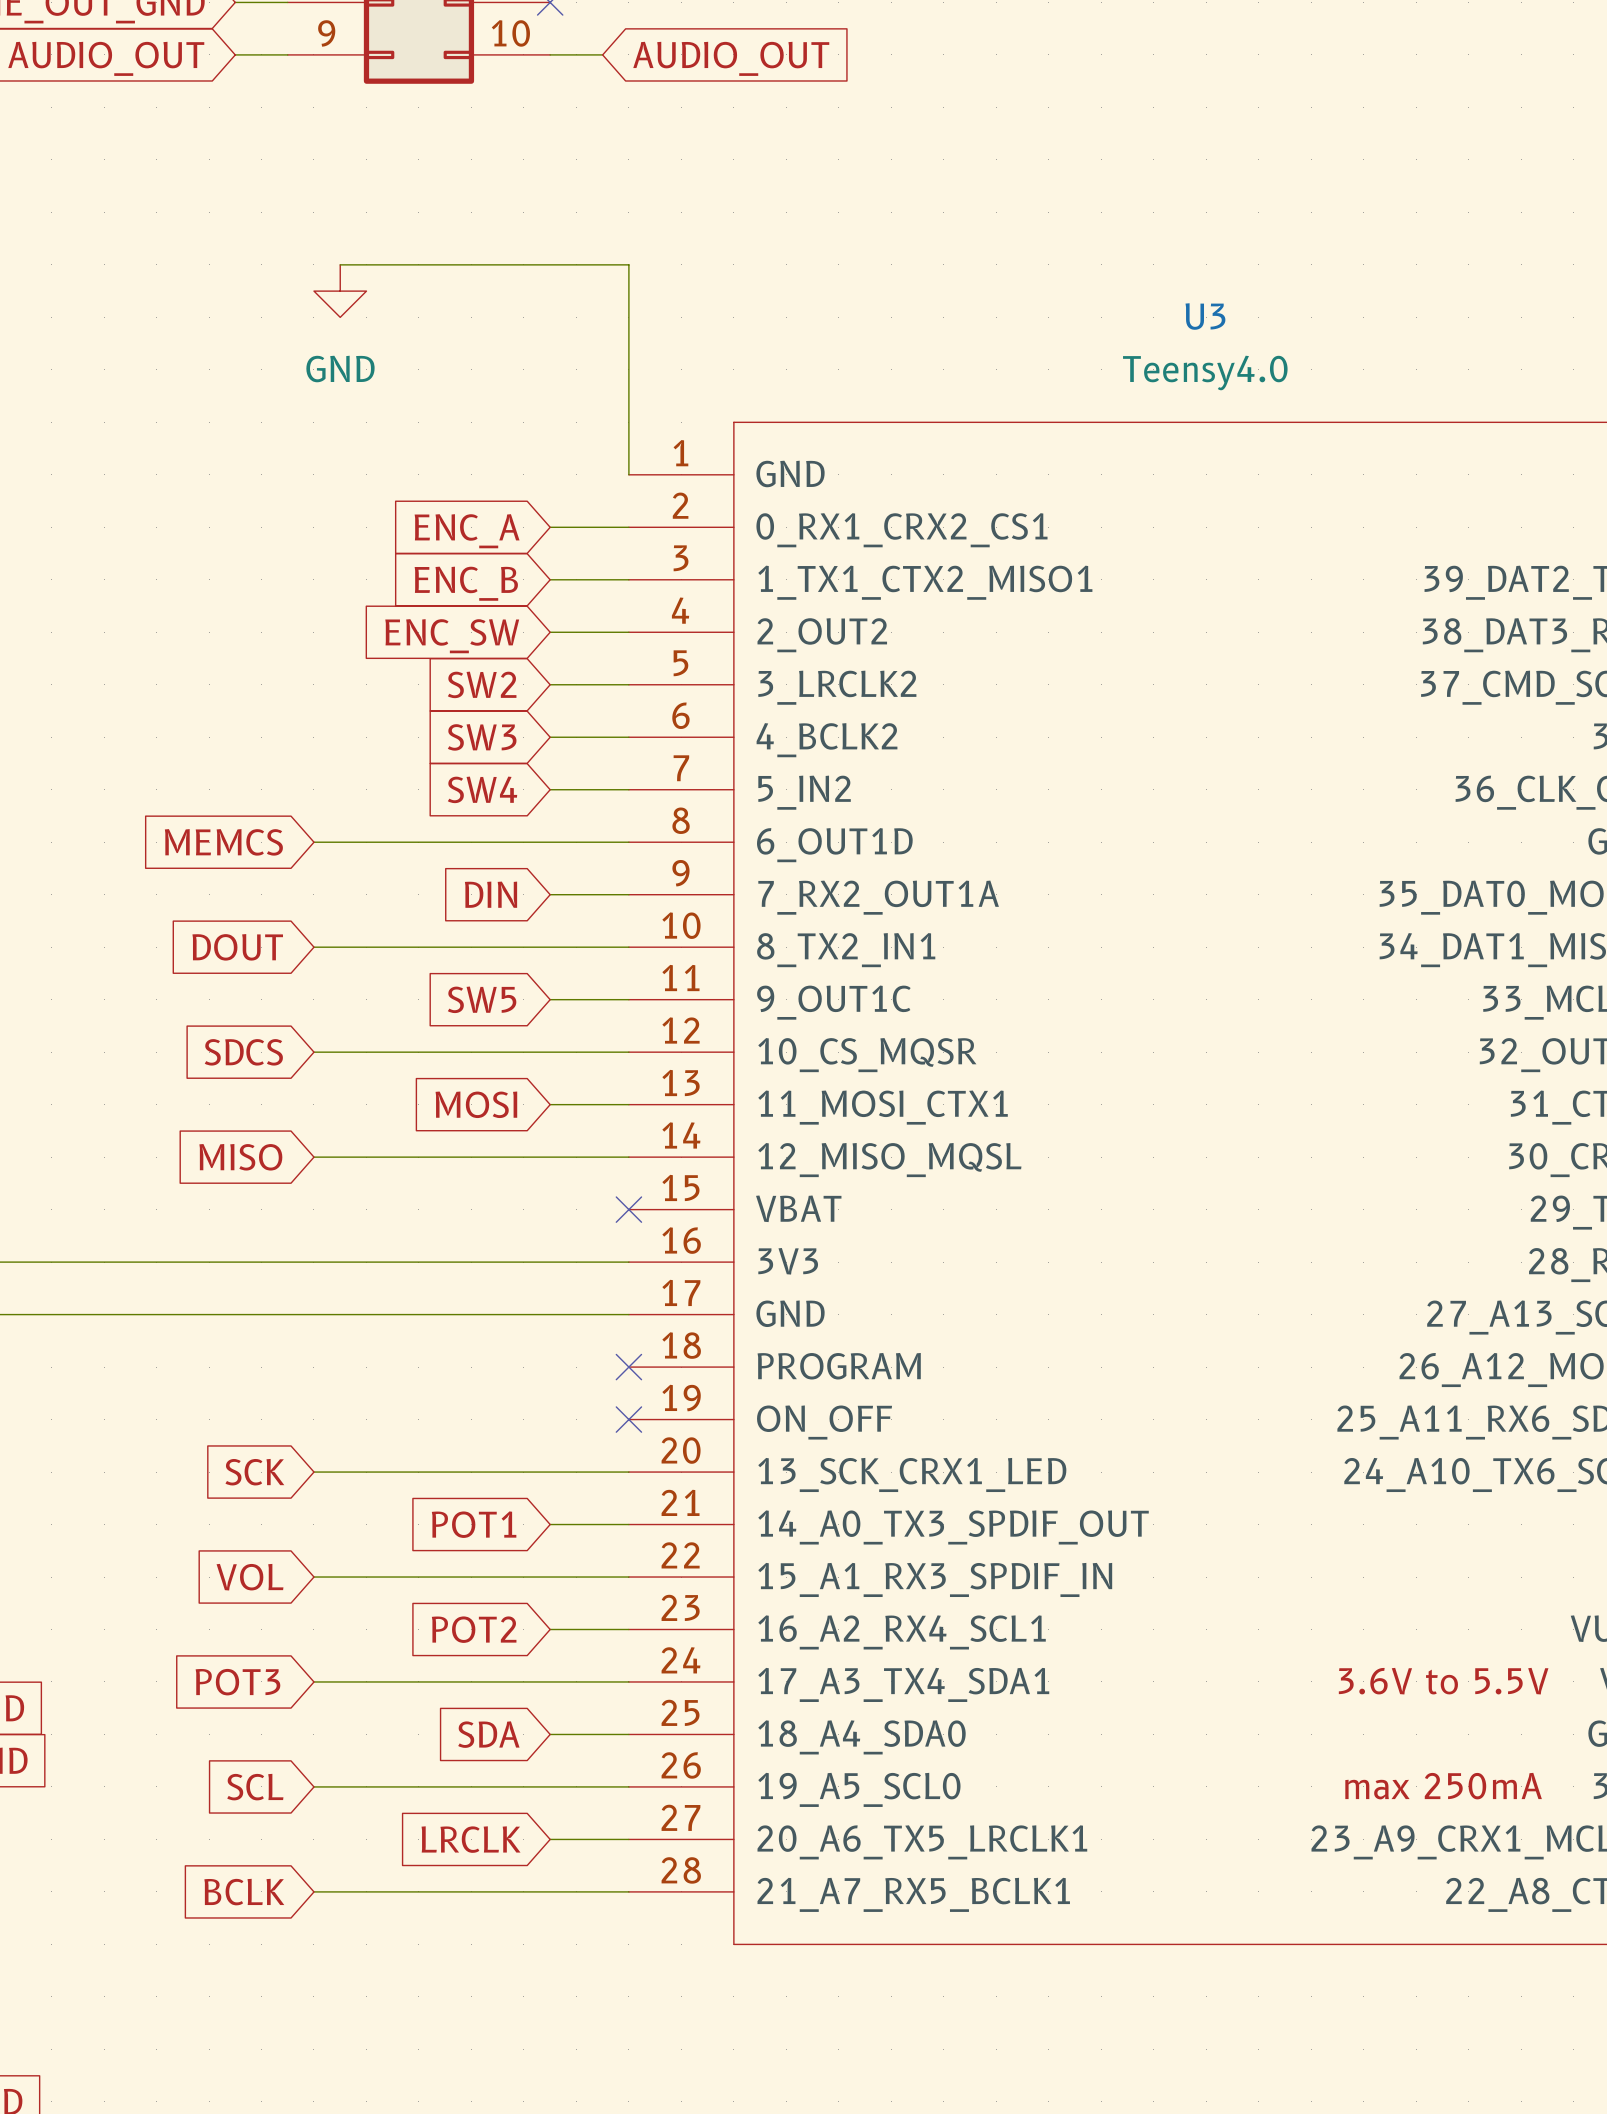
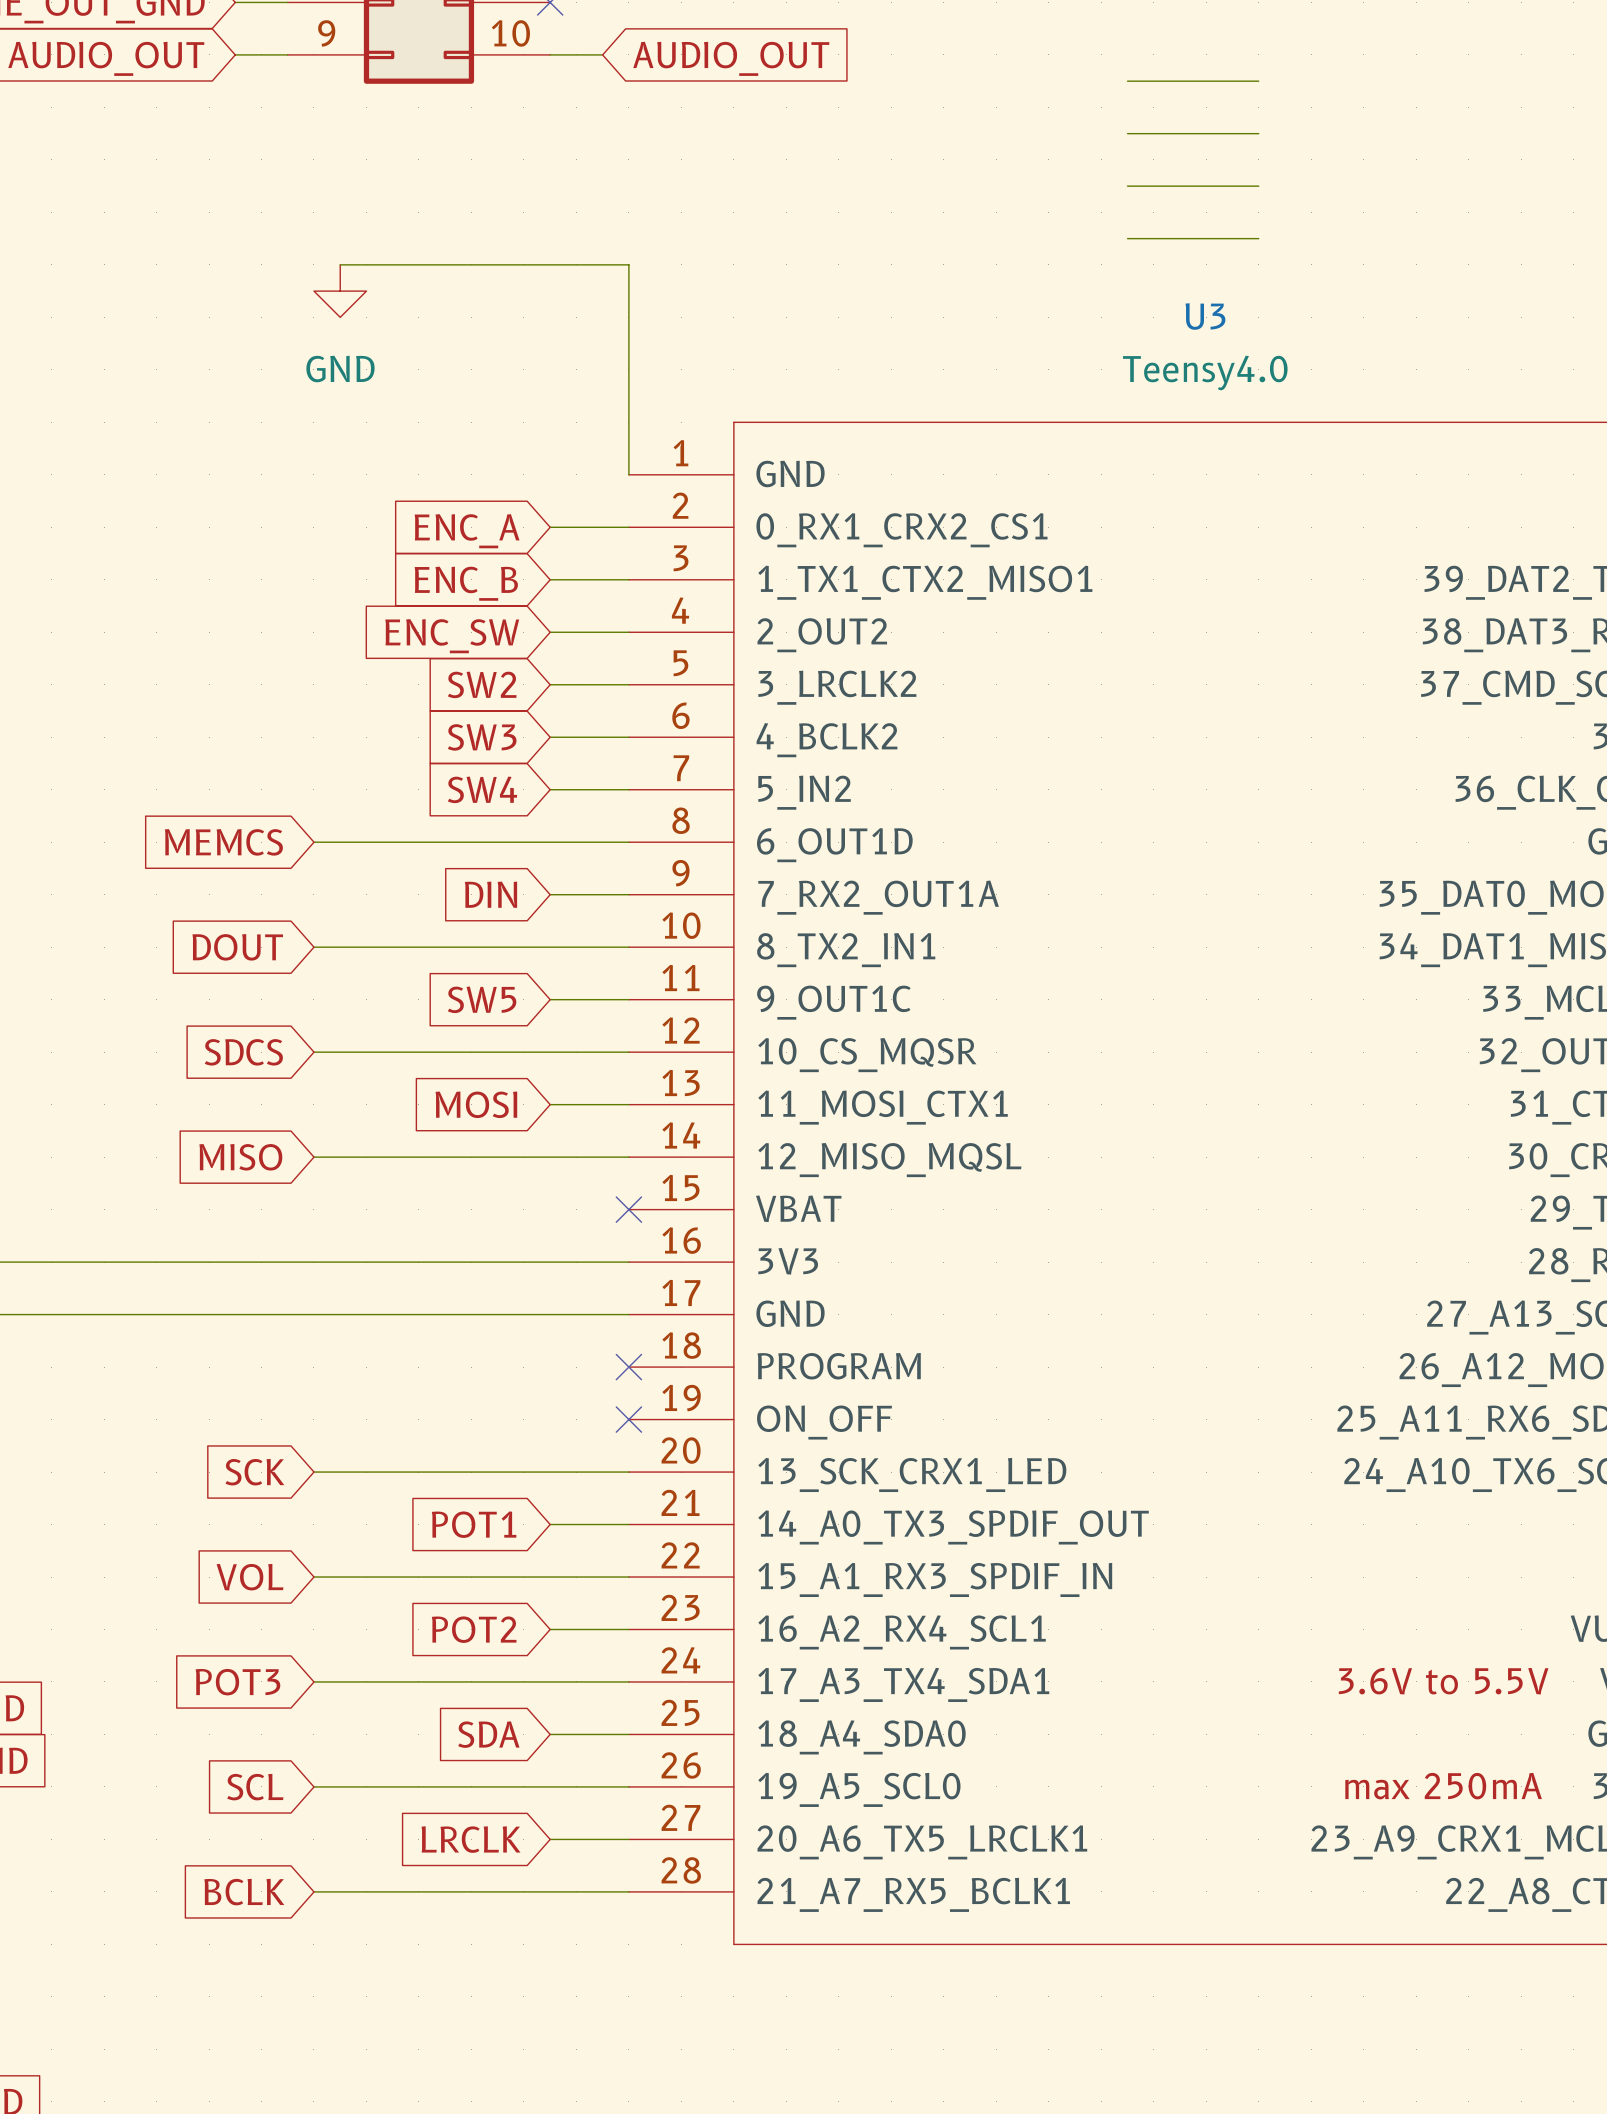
wire: none -> (1127, 81) (1258, 81)
wire: none -> (1127, 133) (1258, 133)
wire: none -> (1127, 186) (1258, 186)
wire: none -> (1127, 238) (1258, 238)

